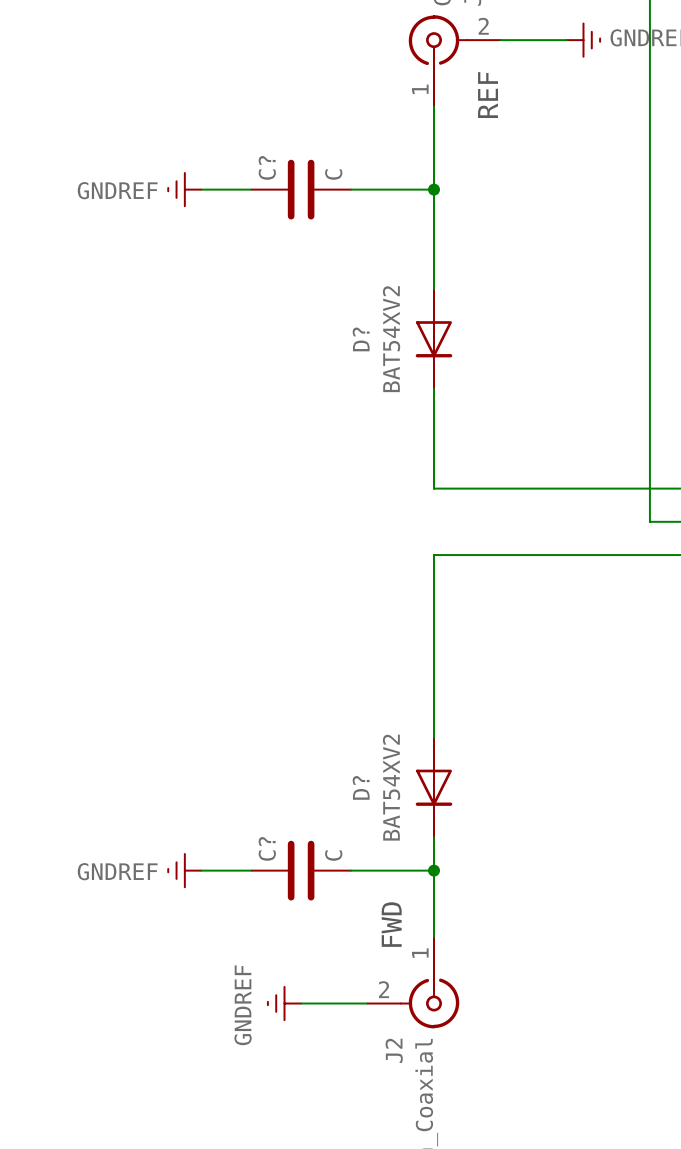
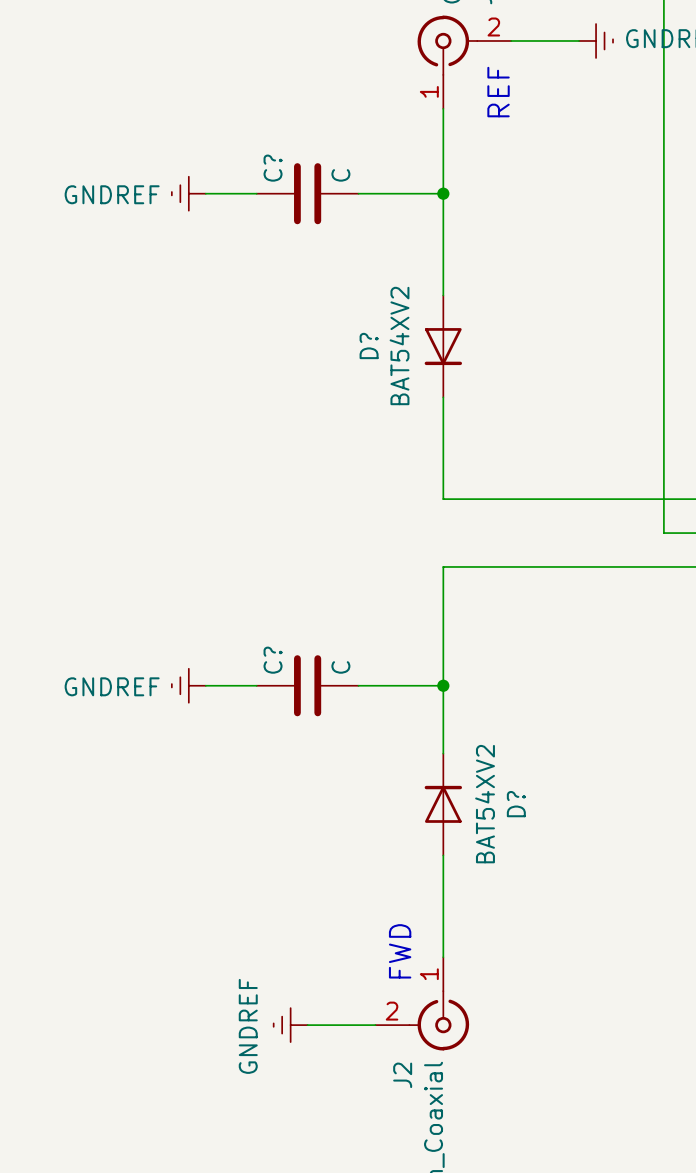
junction: none -> (443, 685)
D? rotation: 0° (434, 787) -> 180° (443, 804)
power symbol position: GNDREF (184, 870) -> GNDREF (188, 685)
wire: (201, 870) (251, 870) -> (205, 685) (256, 685)
C? position: (301, 870) -> (307, 685)
wire: (350, 870) (434, 870) -> (358, 685) (443, 685)
junction: (434, 870) -> none

